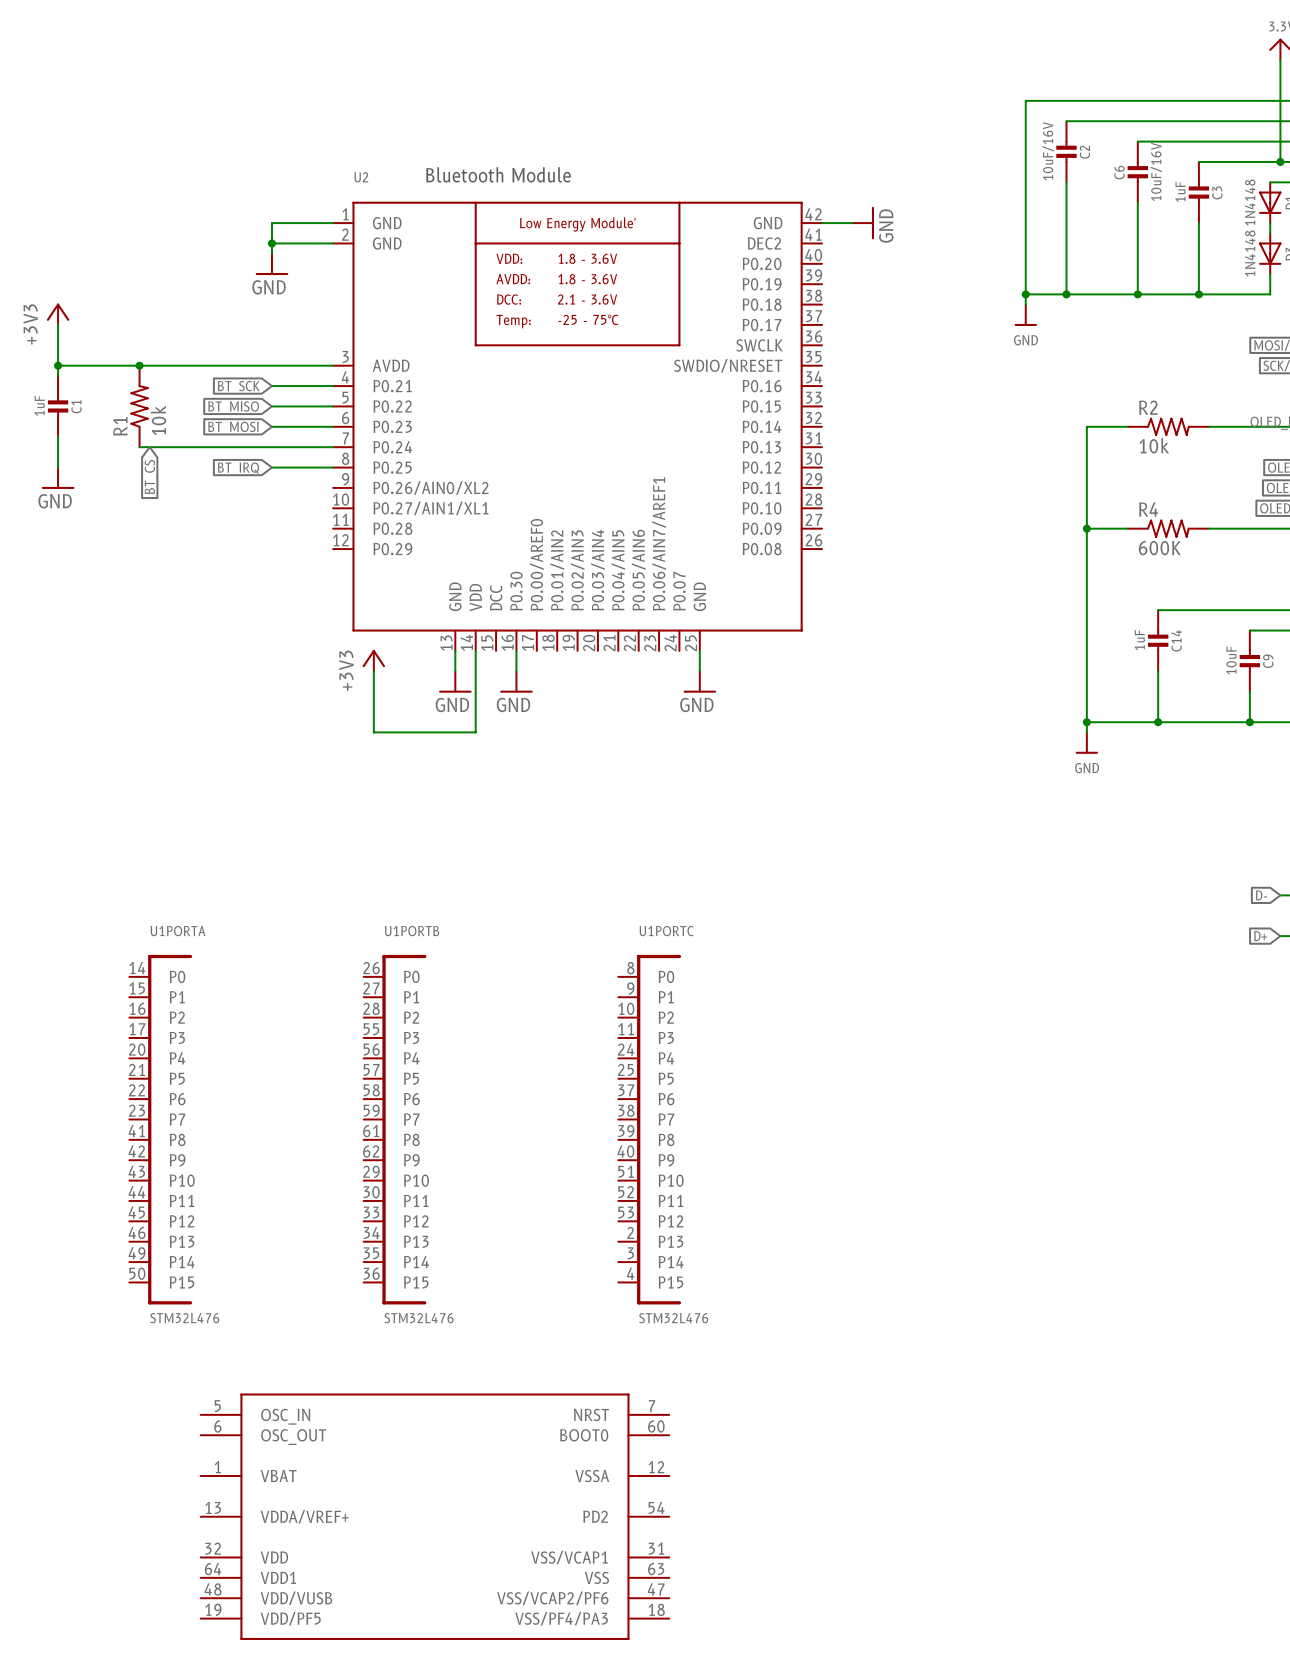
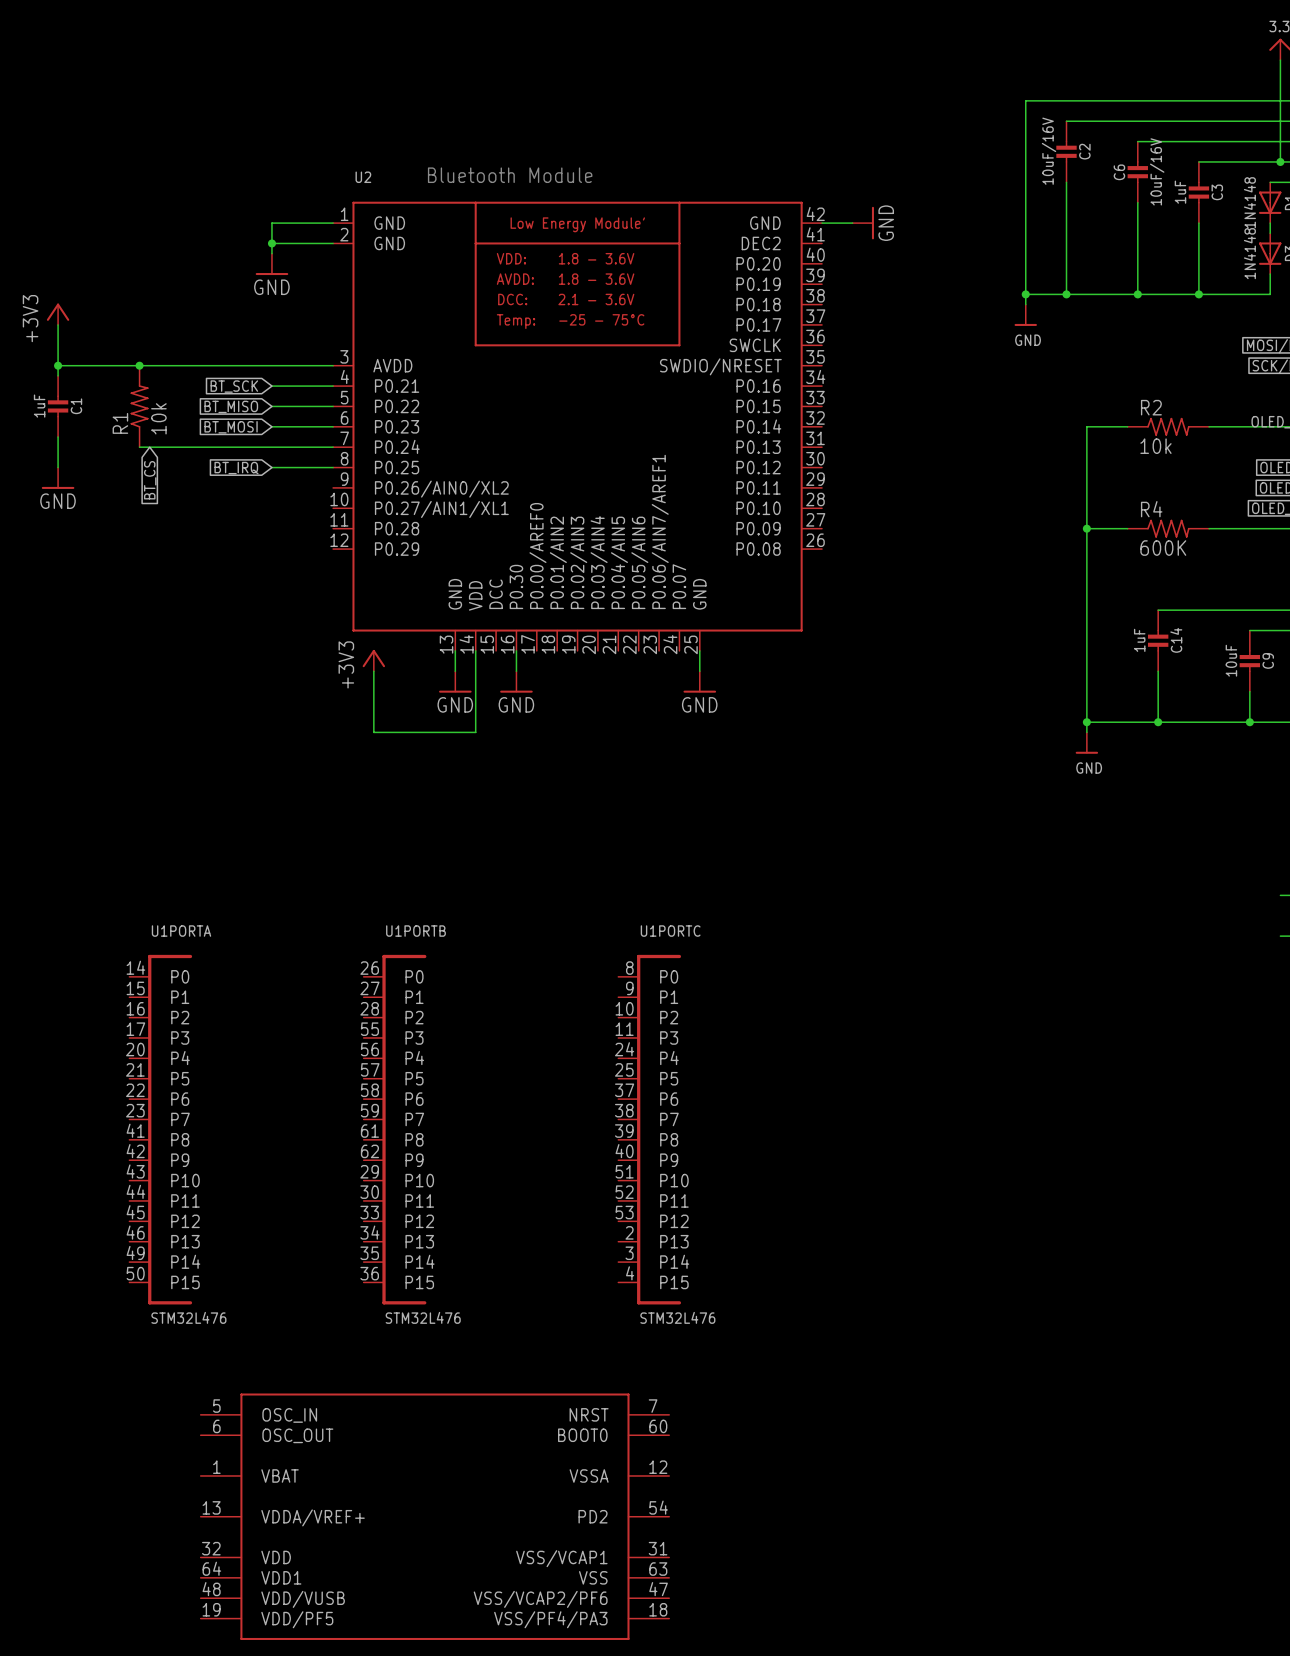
global label: D- (1261, 895) -> none
global label: D+ (1260, 936) -> none

